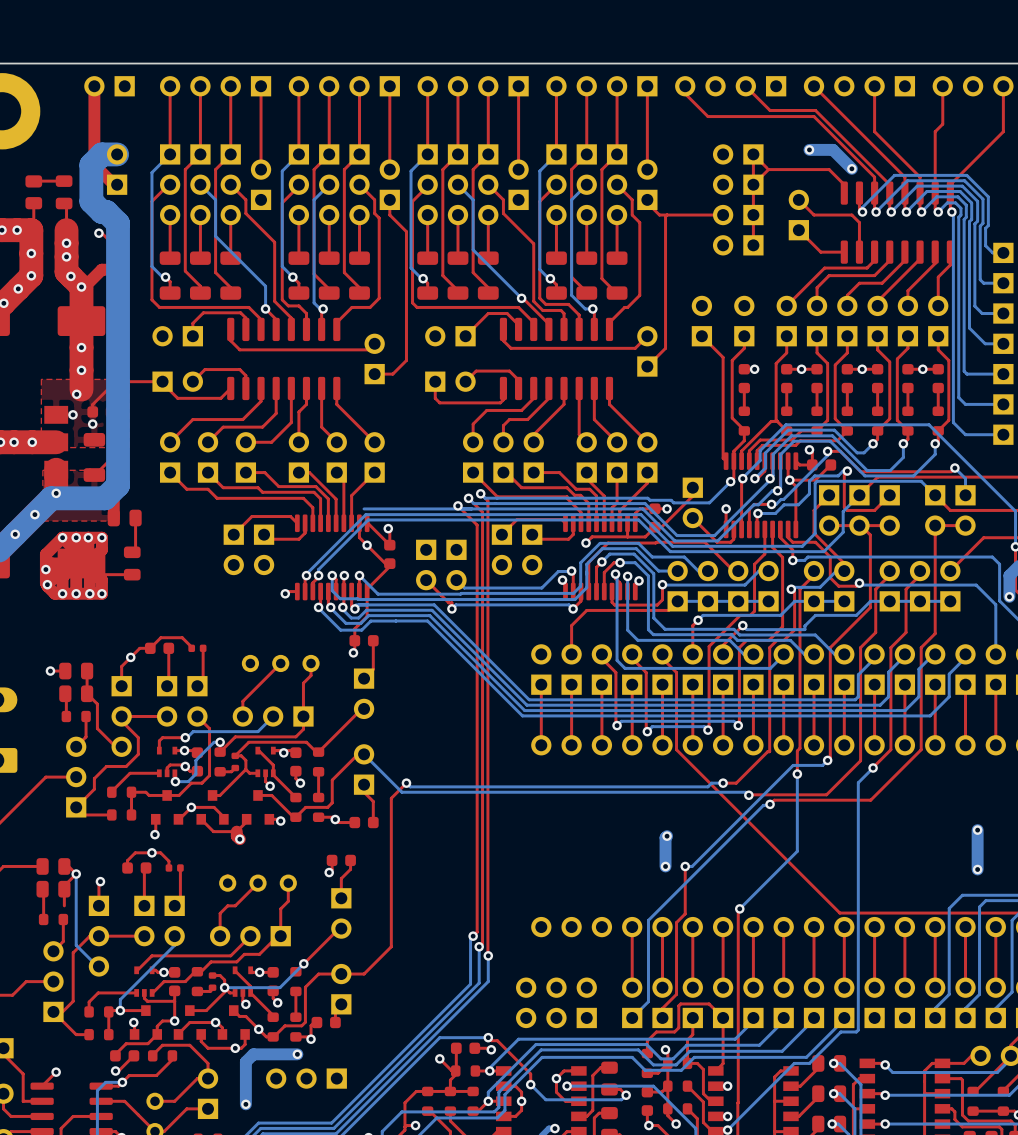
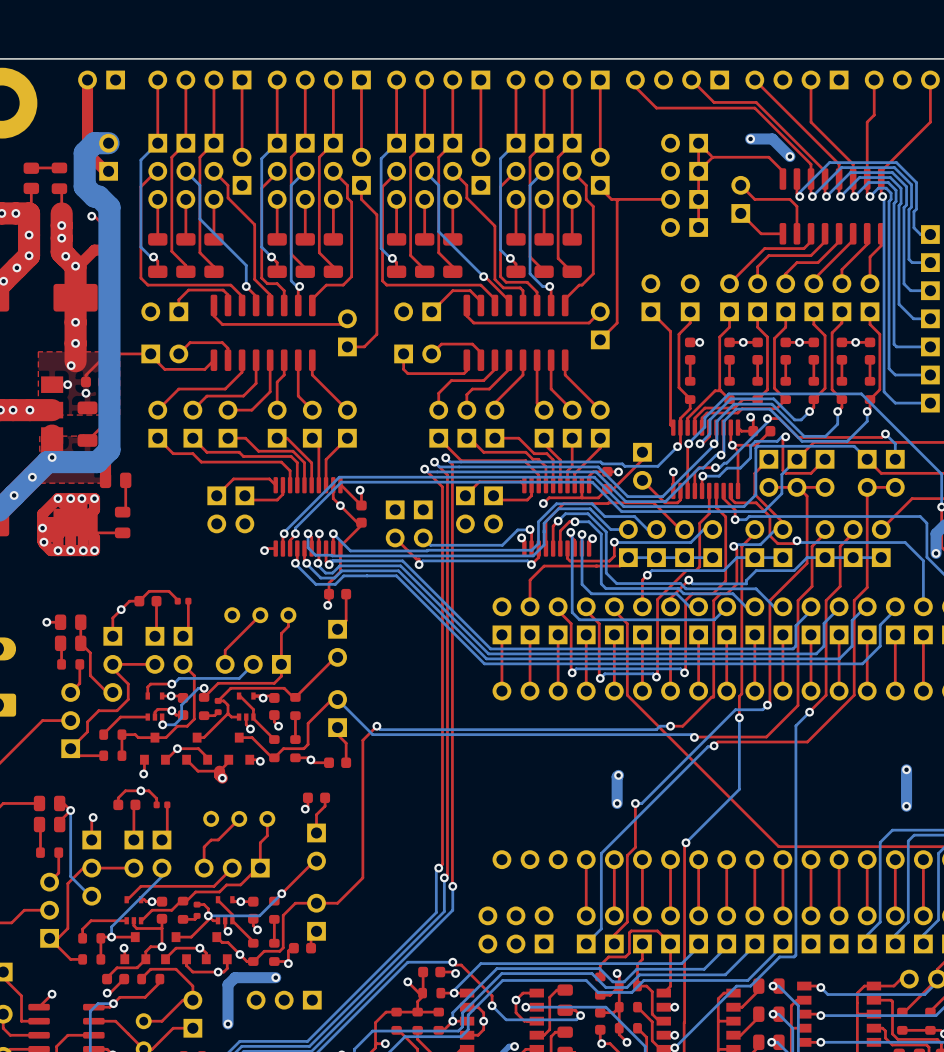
bottom track: (461, 508) (364, 508) -> none
top track: (64, 883) (64, 905) -> none

